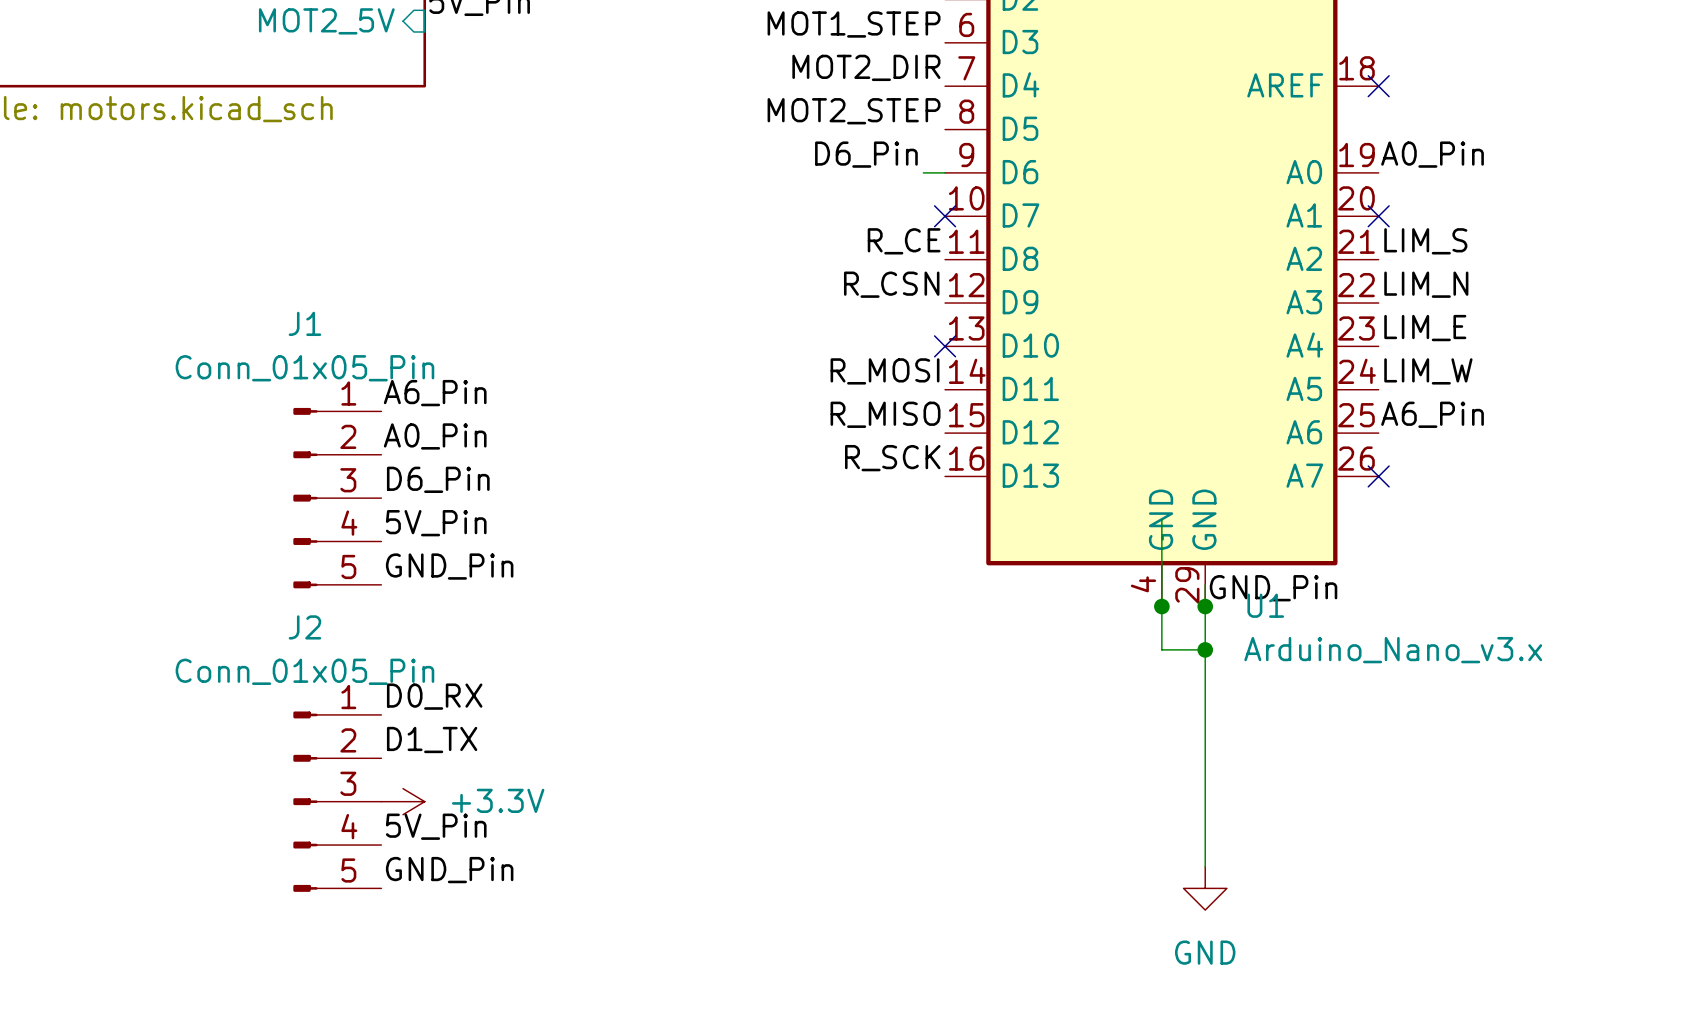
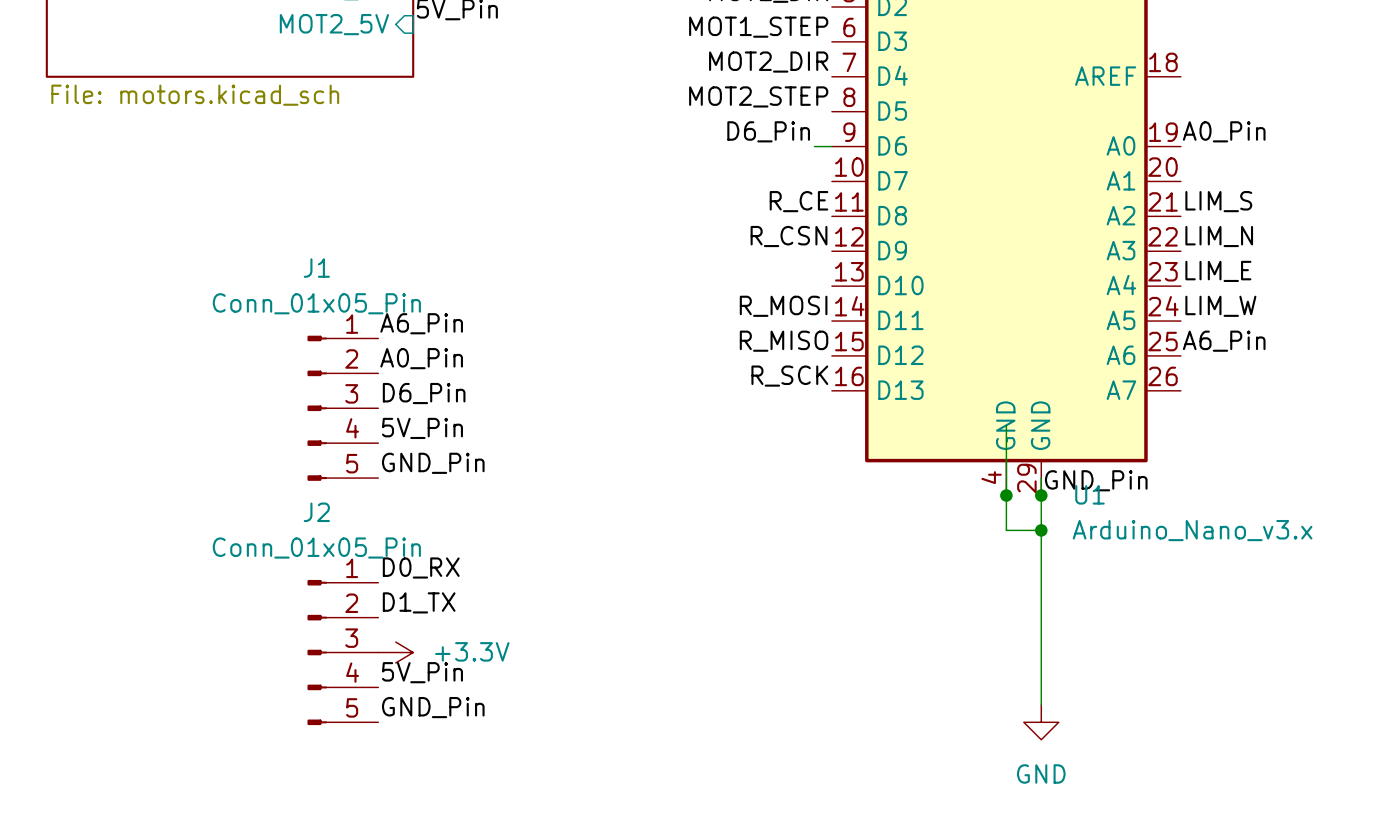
no-connect mark: (1378, 86) -> none
no-connect mark: (945, 216) -> none
no-connect mark: (1378, 216) -> none
no-connect mark: (945, 346) -> none
no-connect mark: (1378, 476) -> none

